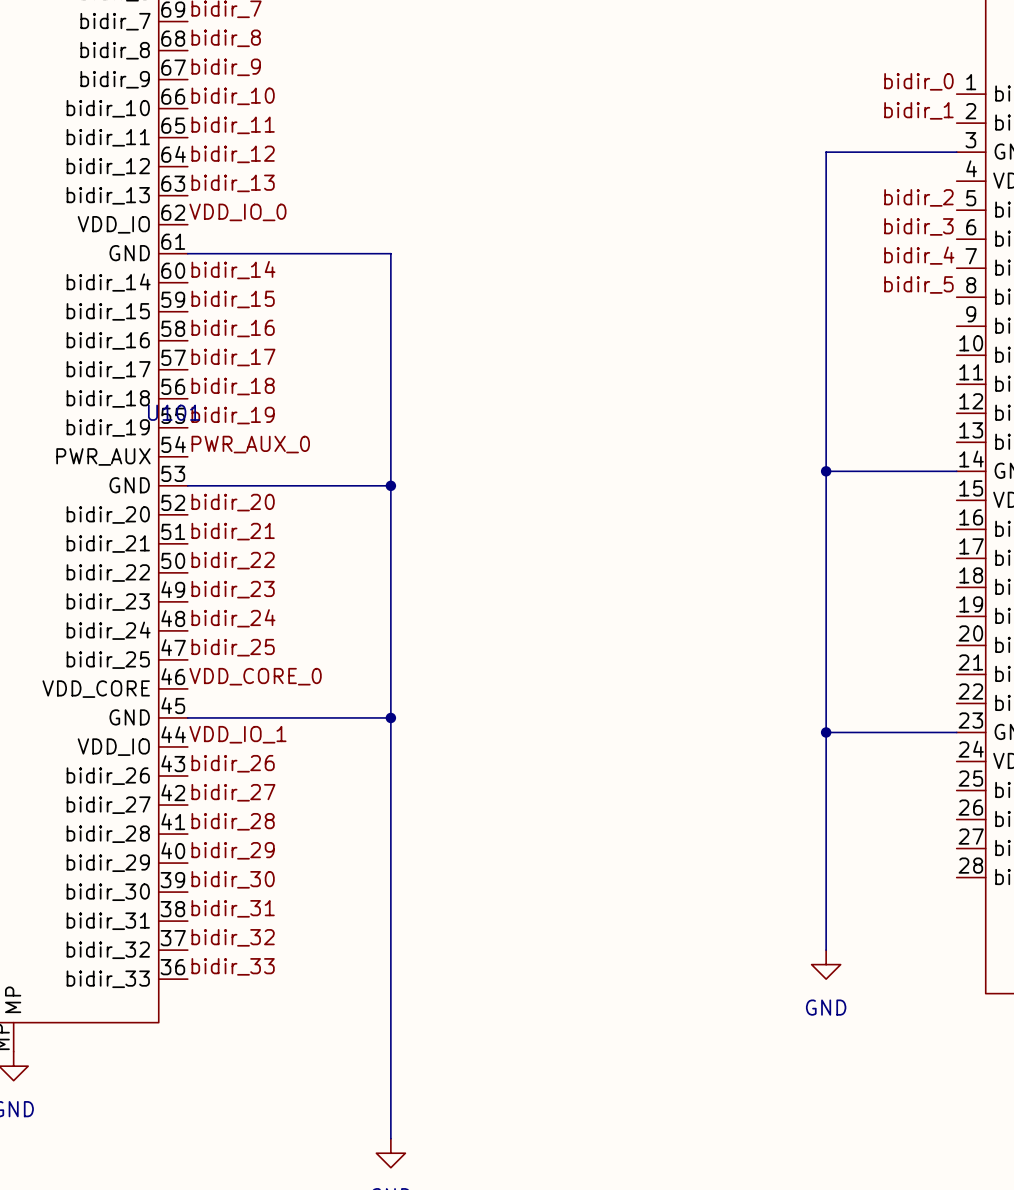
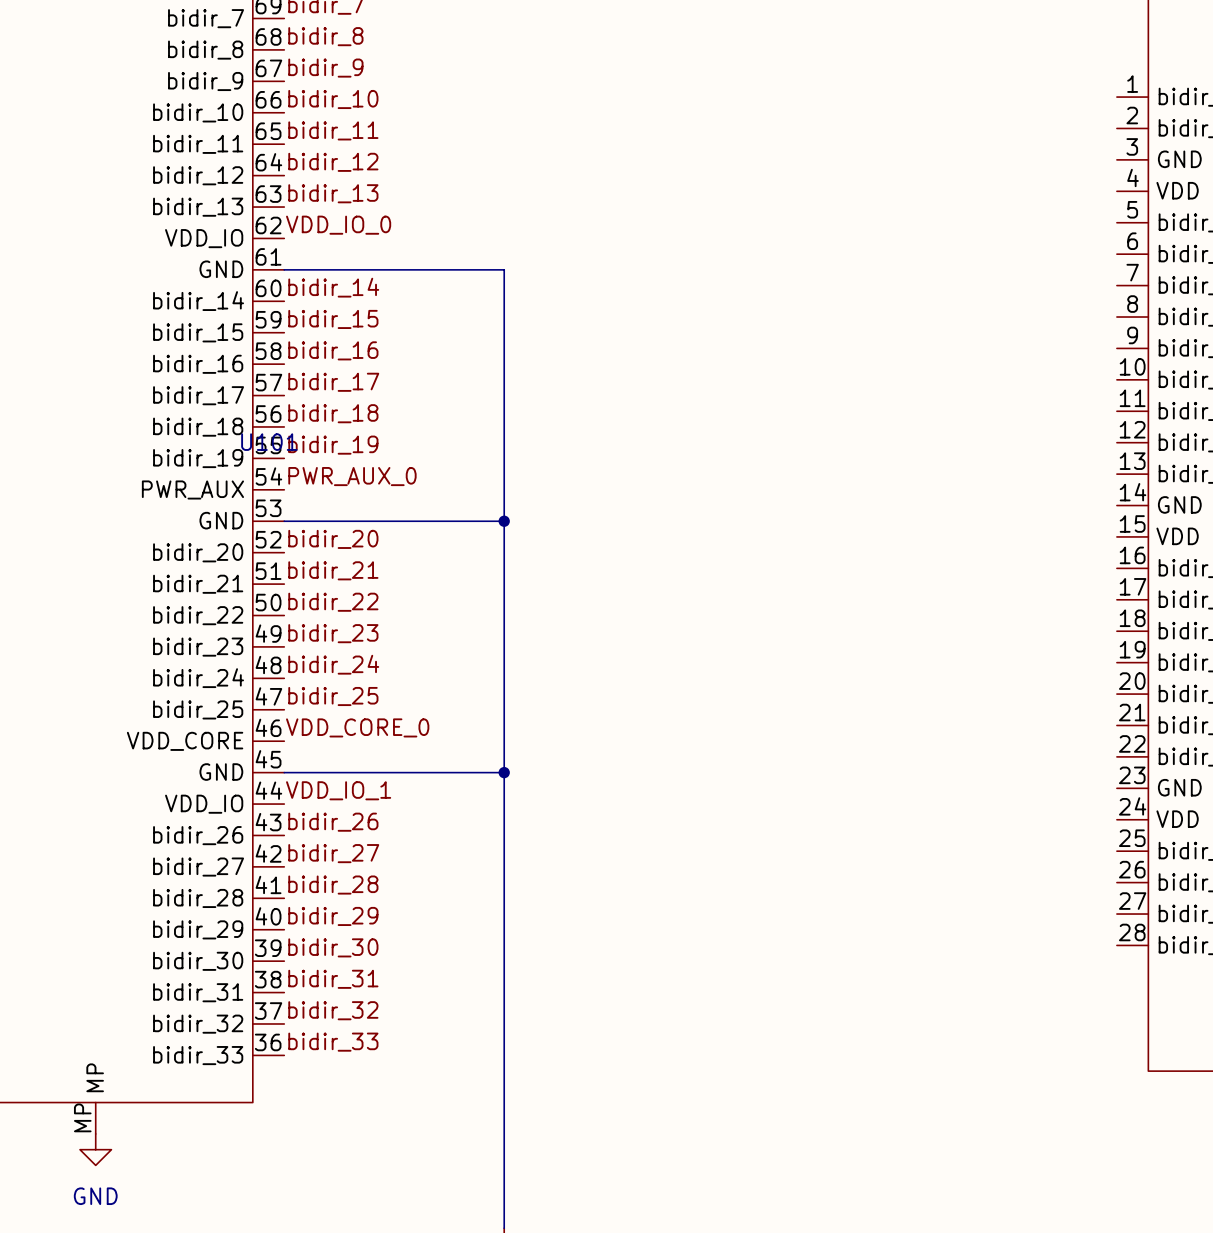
label: bidir_0 (918, 81) -> none
label: bidir_1 (918, 110) -> none
wire: (956, 152) (826, 152) (826, 950) -> none
label: bidir_2 (918, 197) -> none
label: bidir_3 (918, 226) -> none
label: bidir_4 (919, 255) -> none
label: bidir_5 (918, 284) -> none
wire: (826, 471) (956, 471) -> none
junction: (826, 471) -> none
wire: (826, 732) (956, 732) -> none
junction: (826, 732) -> none
power symbol: GND (826, 964) -> none

